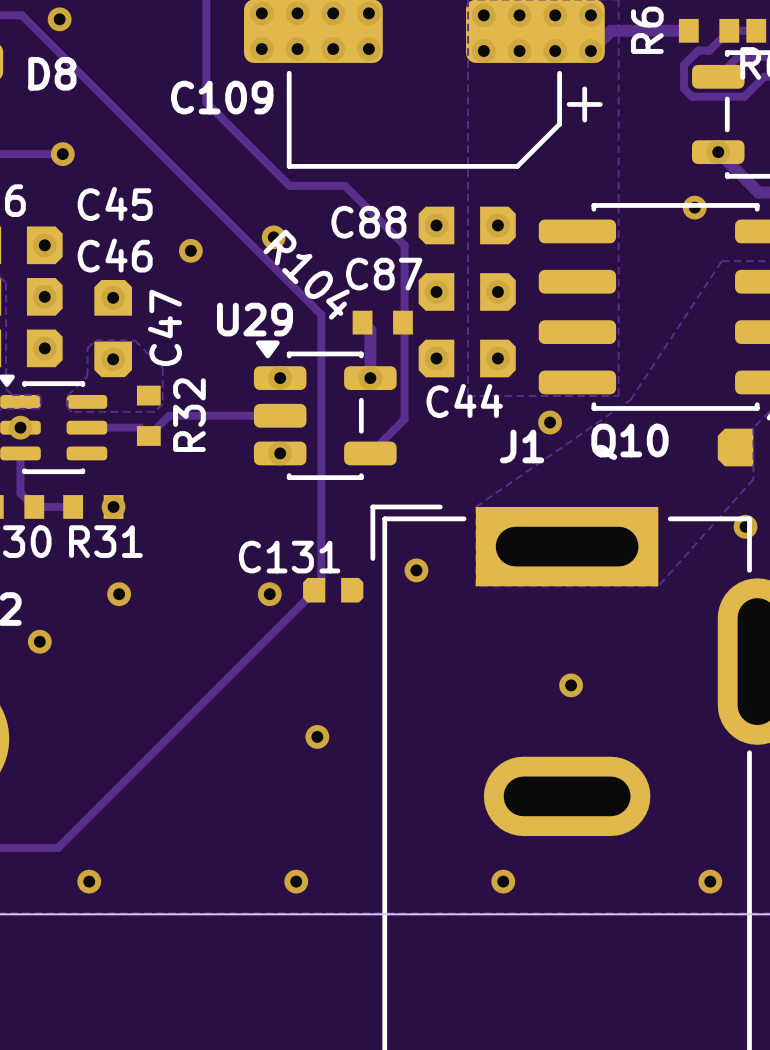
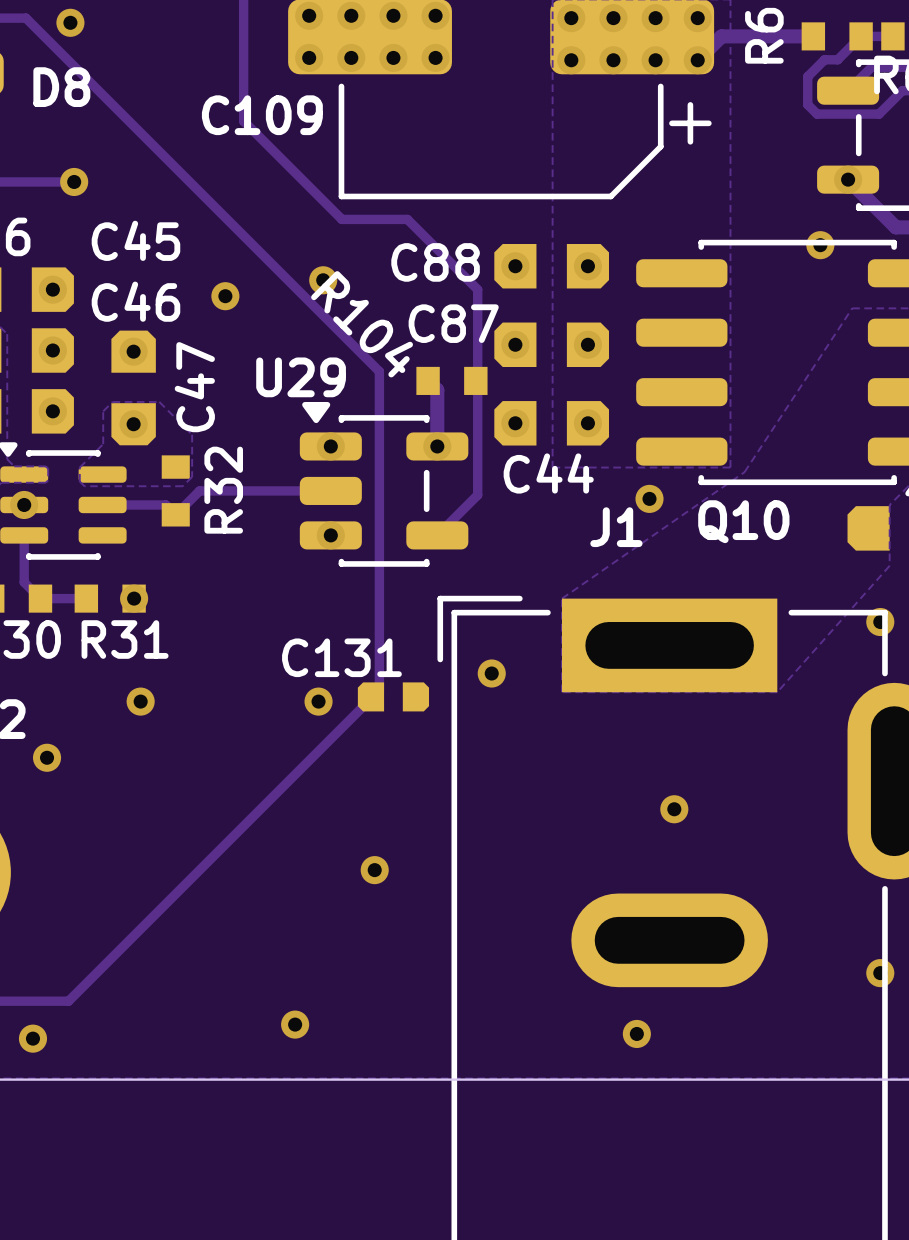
via: none -> (880, 973)
via position: (89, 881) -> (32, 1038)
via position: (296, 881) -> (295, 1024)
via position: (503, 881) -> (636, 1033)
via: (710, 881) -> none

